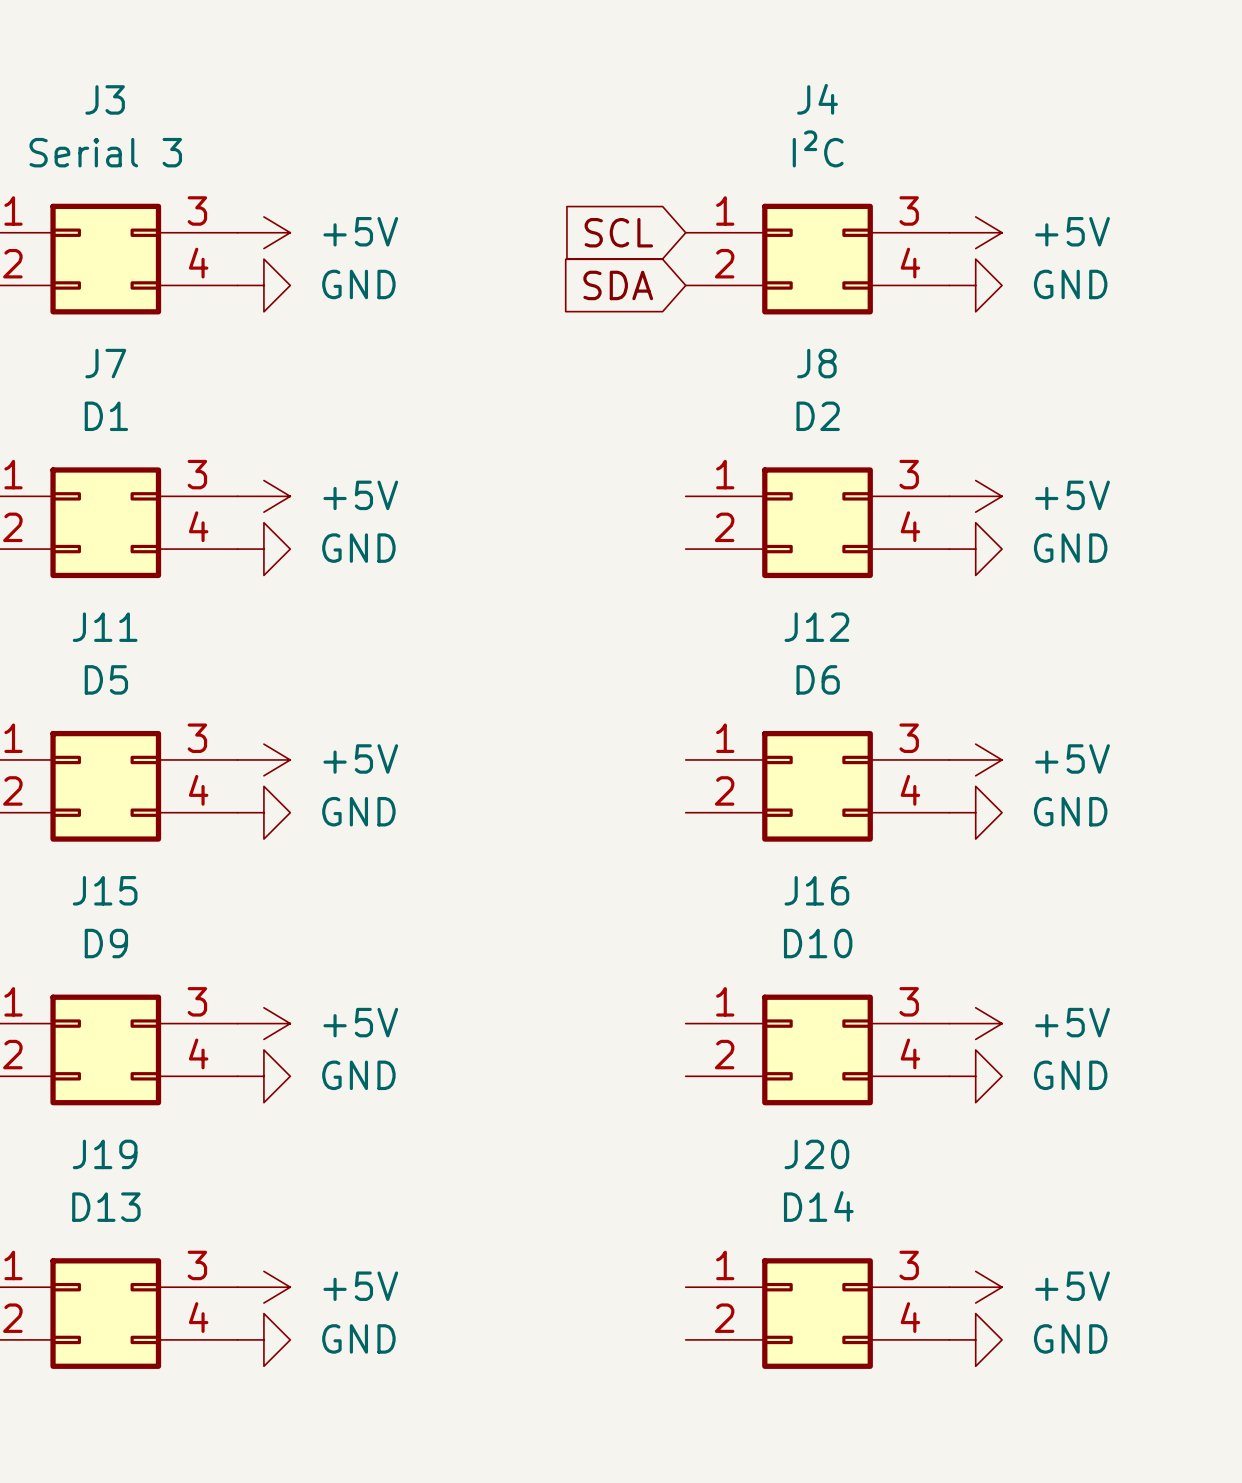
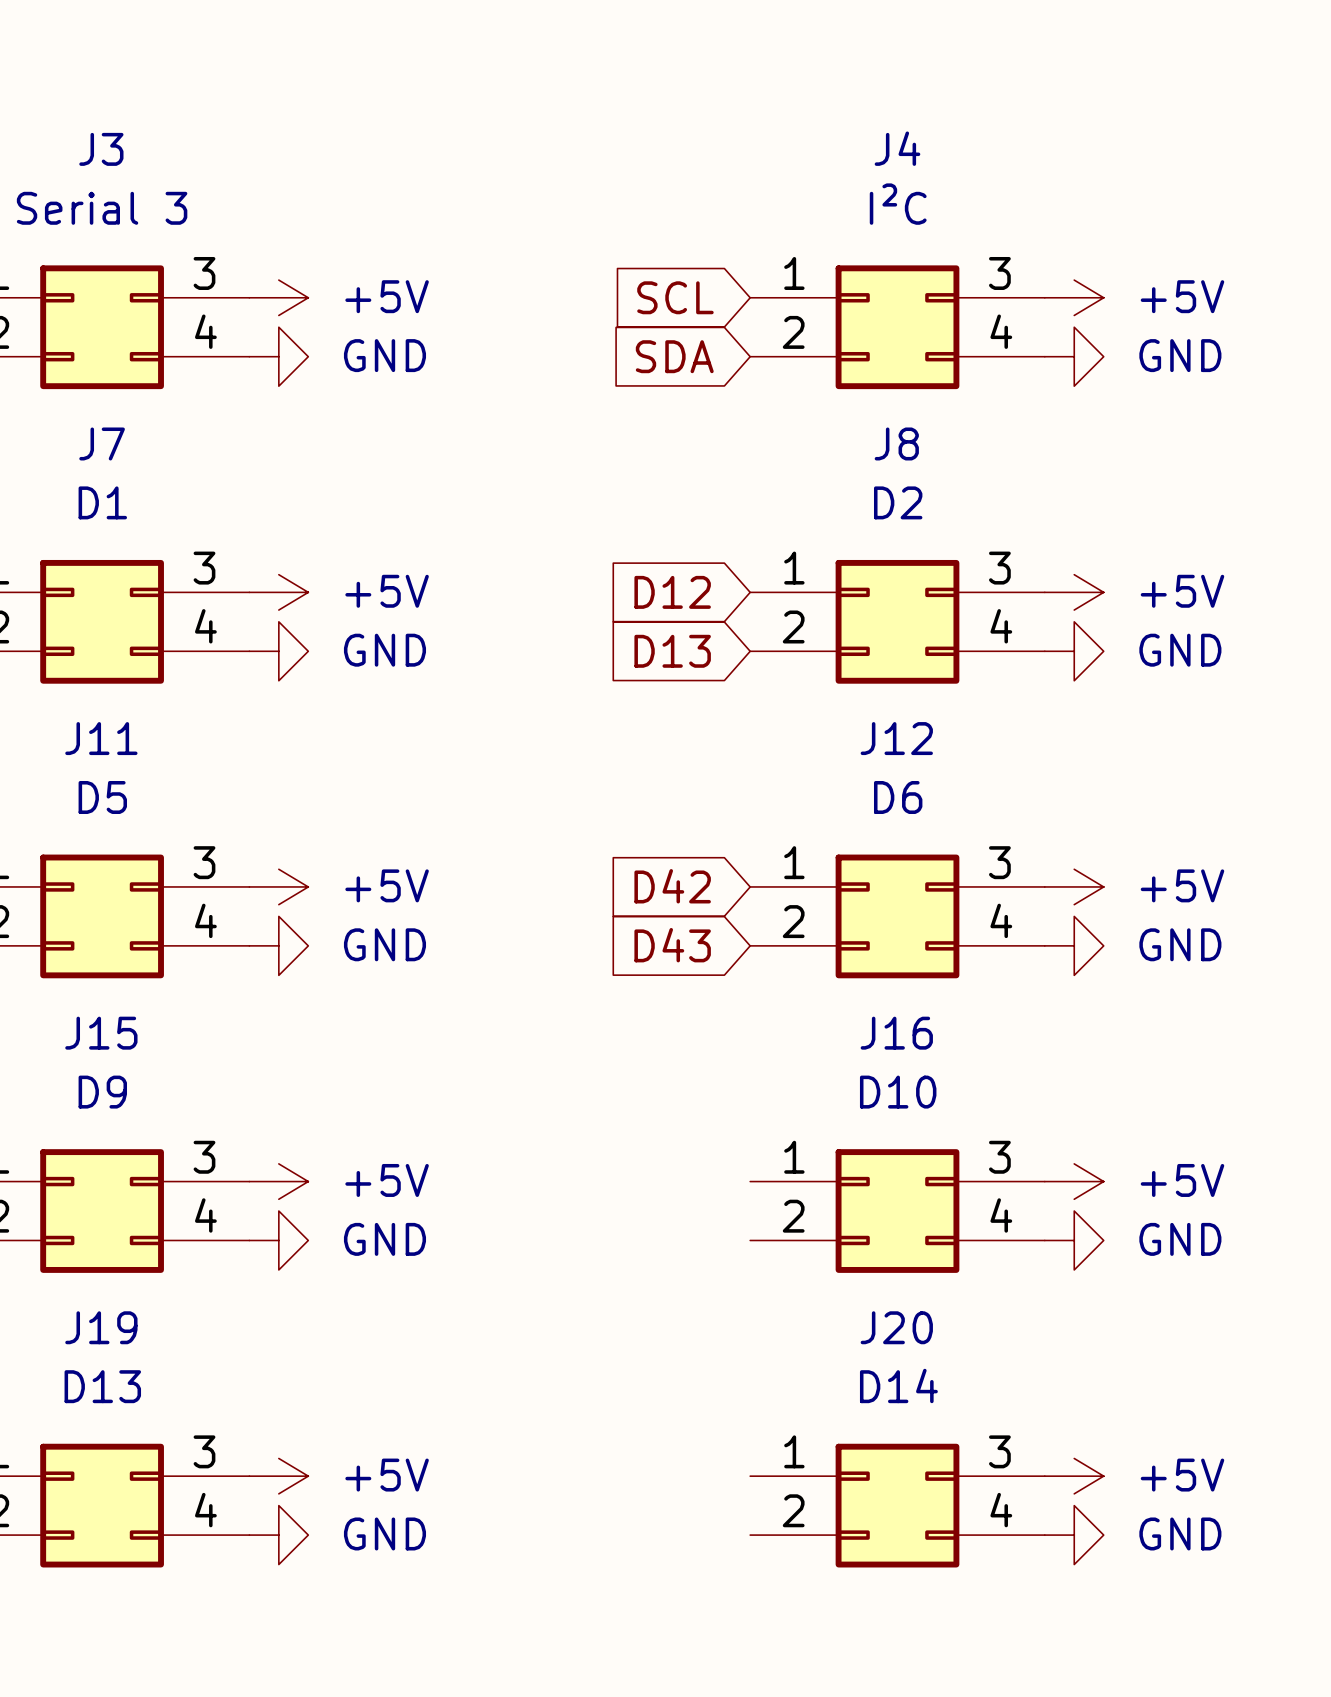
global label: none -> D12 (672, 592)
global label: none -> D13 (672, 651)
global label: none -> D42 (672, 886)
global label: none -> D43 (672, 945)

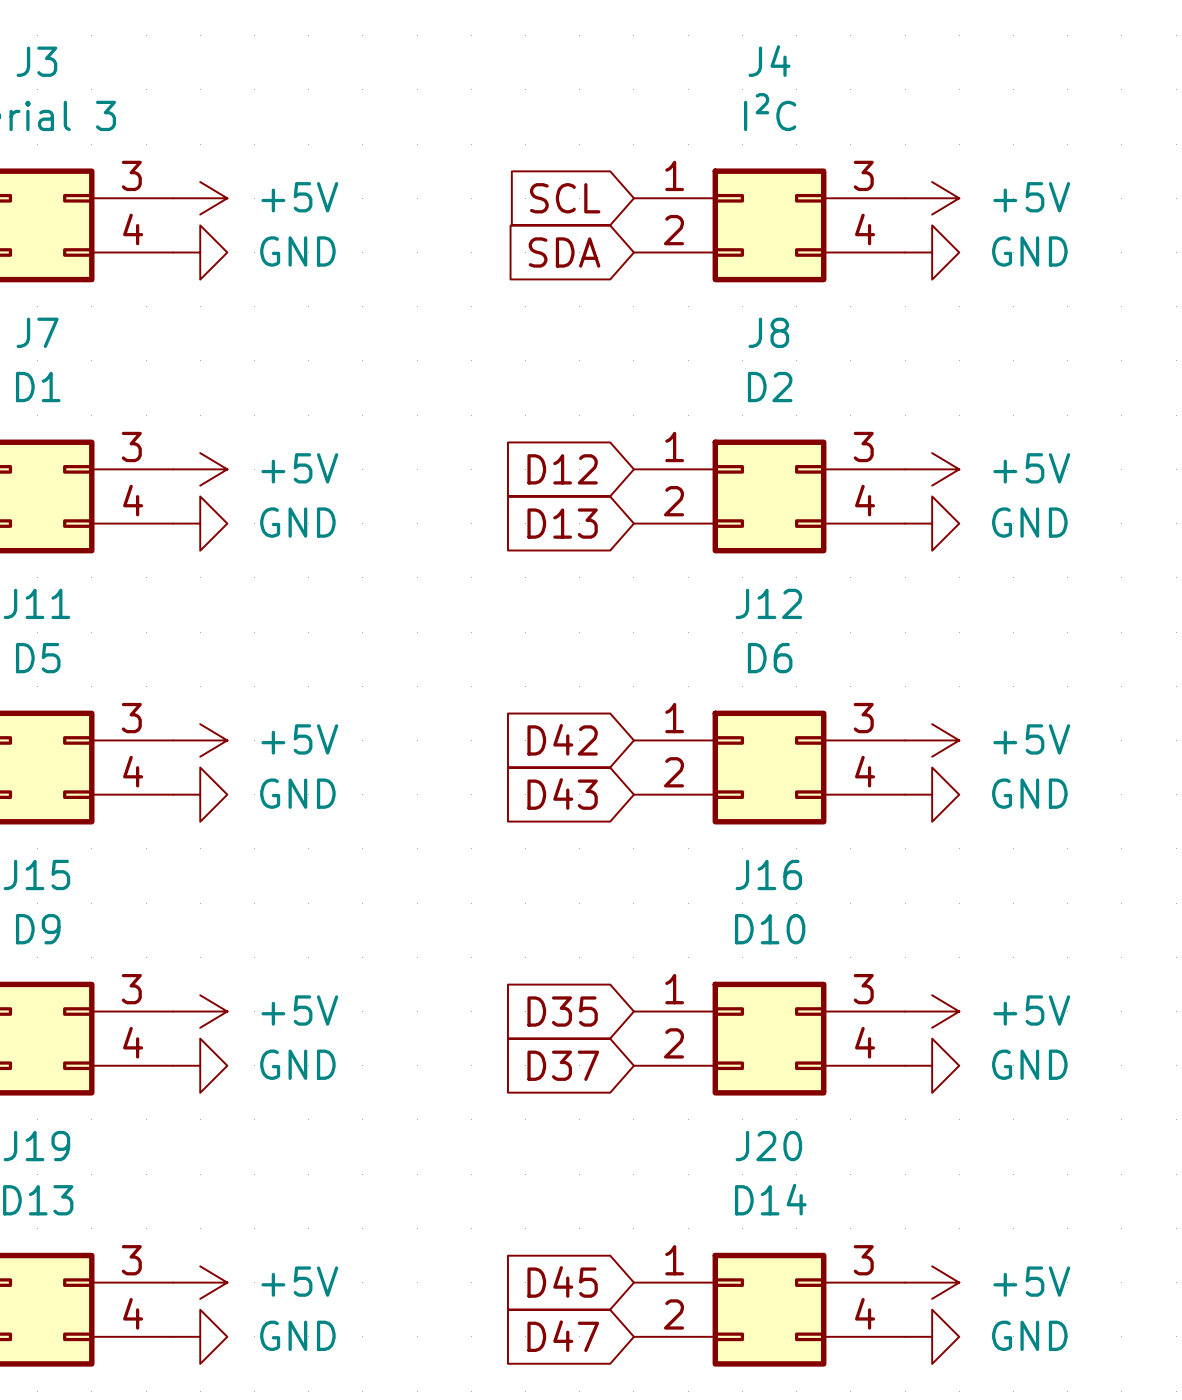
global label: none -> D35 (562, 1011)
global label: none -> D37 (563, 1065)
global label: none -> D45 (562, 1281)
global label: none -> D47 (563, 1336)

